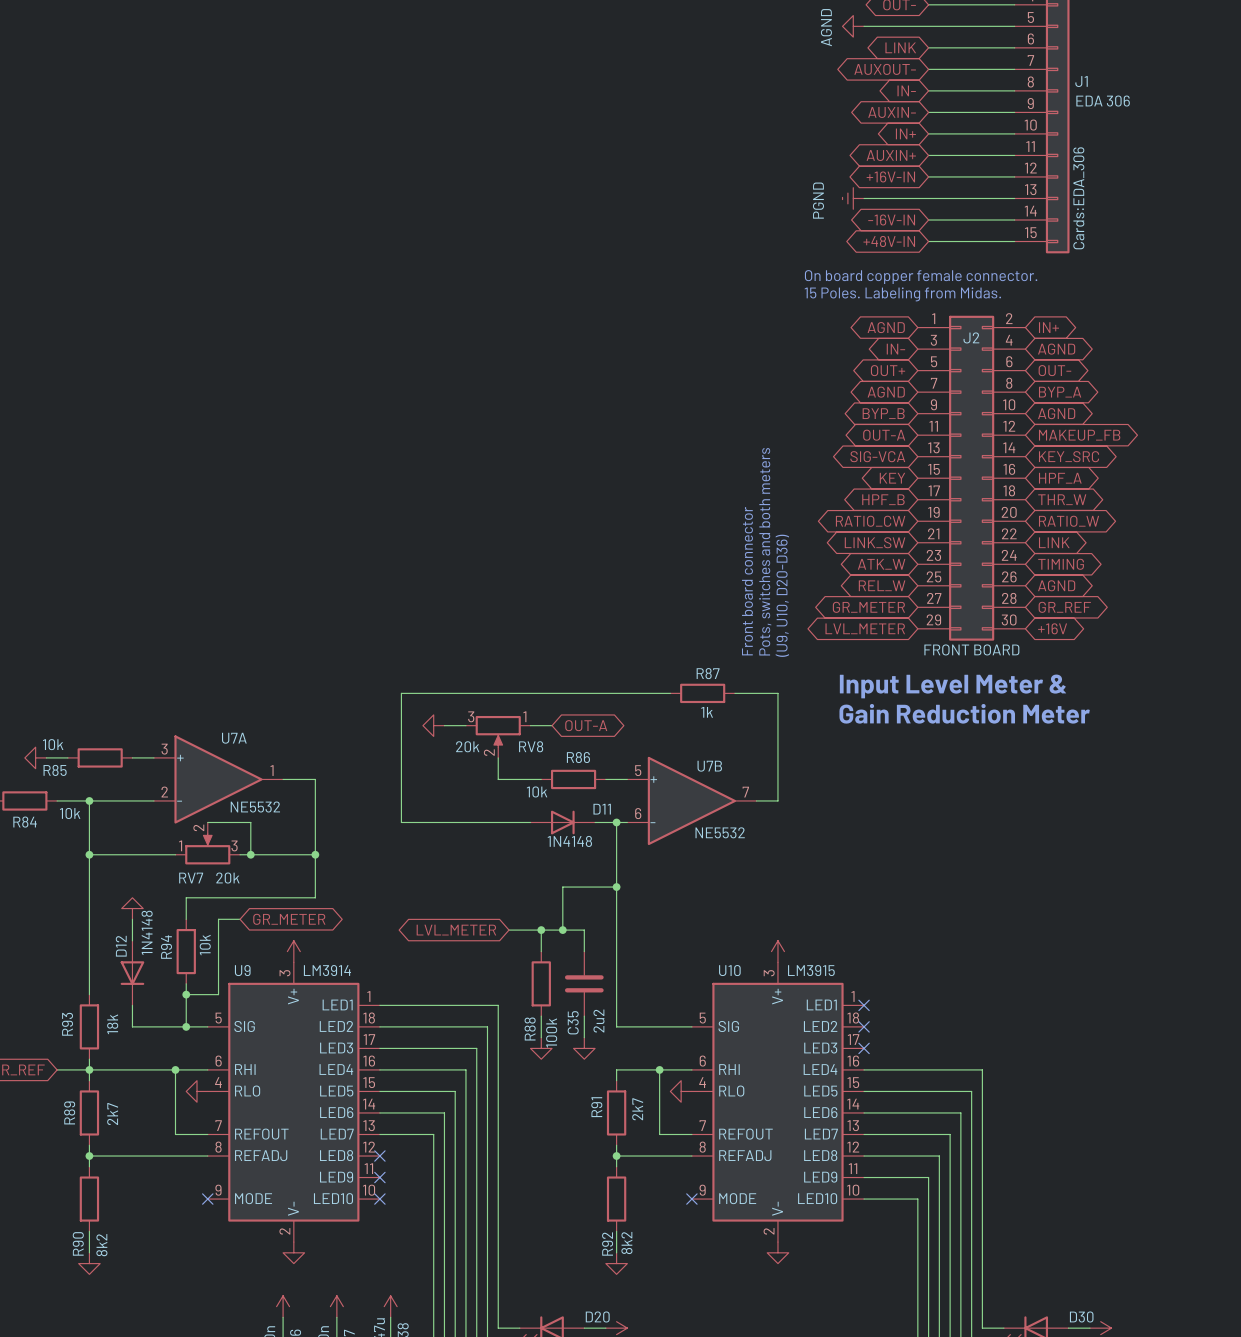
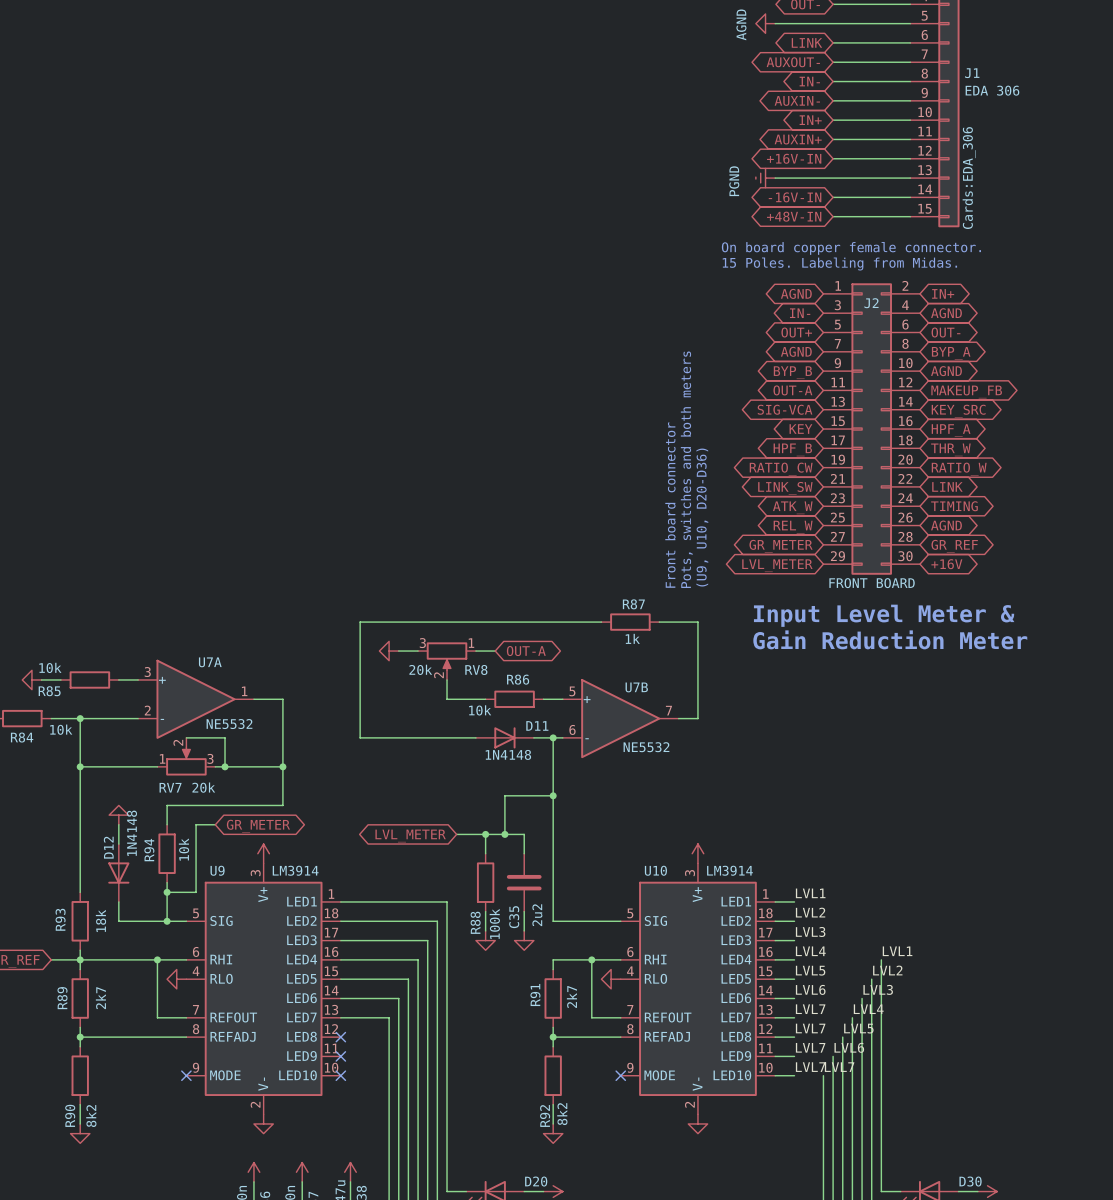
U10 value: LM3915 (811, 970) -> LM3914 (729, 870)
label: none -> LVL1 (810, 893)
wire: none -> (775, 901) (794, 901)
no-connect mark: (864, 1005) -> none
label: none -> LVL2 (810, 912)
wire: none -> (775, 921) (794, 921)
no-connect mark: (864, 1026) -> none
label: none -> LVL3 (810, 931)
wire: none -> (775, 940) (794, 940)
no-connect mark: (864, 1048) -> none
label: none -> LVL4 (810, 951)
label: none -> LVL1 (897, 951)
wire: (885, 1069) (982, 1069) -> none
label: none -> LVL5 (810, 970)
label: none -> LVL2 (887, 970)
wire: (885, 1091) (971, 1091) -> none
label: none -> LVL6 (810, 989)
label: none -> LVL3 (878, 989)
wire: (885, 1112) (960, 1112) -> none
label: none -> LVL7 (810, 1009)
label: none -> LVL4 (868, 1009)
wire: (885, 1134) (950, 1134) -> none
label: none -> LVL7 (810, 1028)
label: none -> LVL5 (858, 1028)
wire: (885, 1156) (939, 1156) -> none
label: none -> LVL7 (810, 1047)
label: none -> LVL6 (849, 1047)
wire: (885, 1177) (928, 1177) -> none
label: none -> LVL7 (810, 1067)
label: none -> LVL7 (839, 1067)
wire: (885, 1199) (917, 1199) -> none

